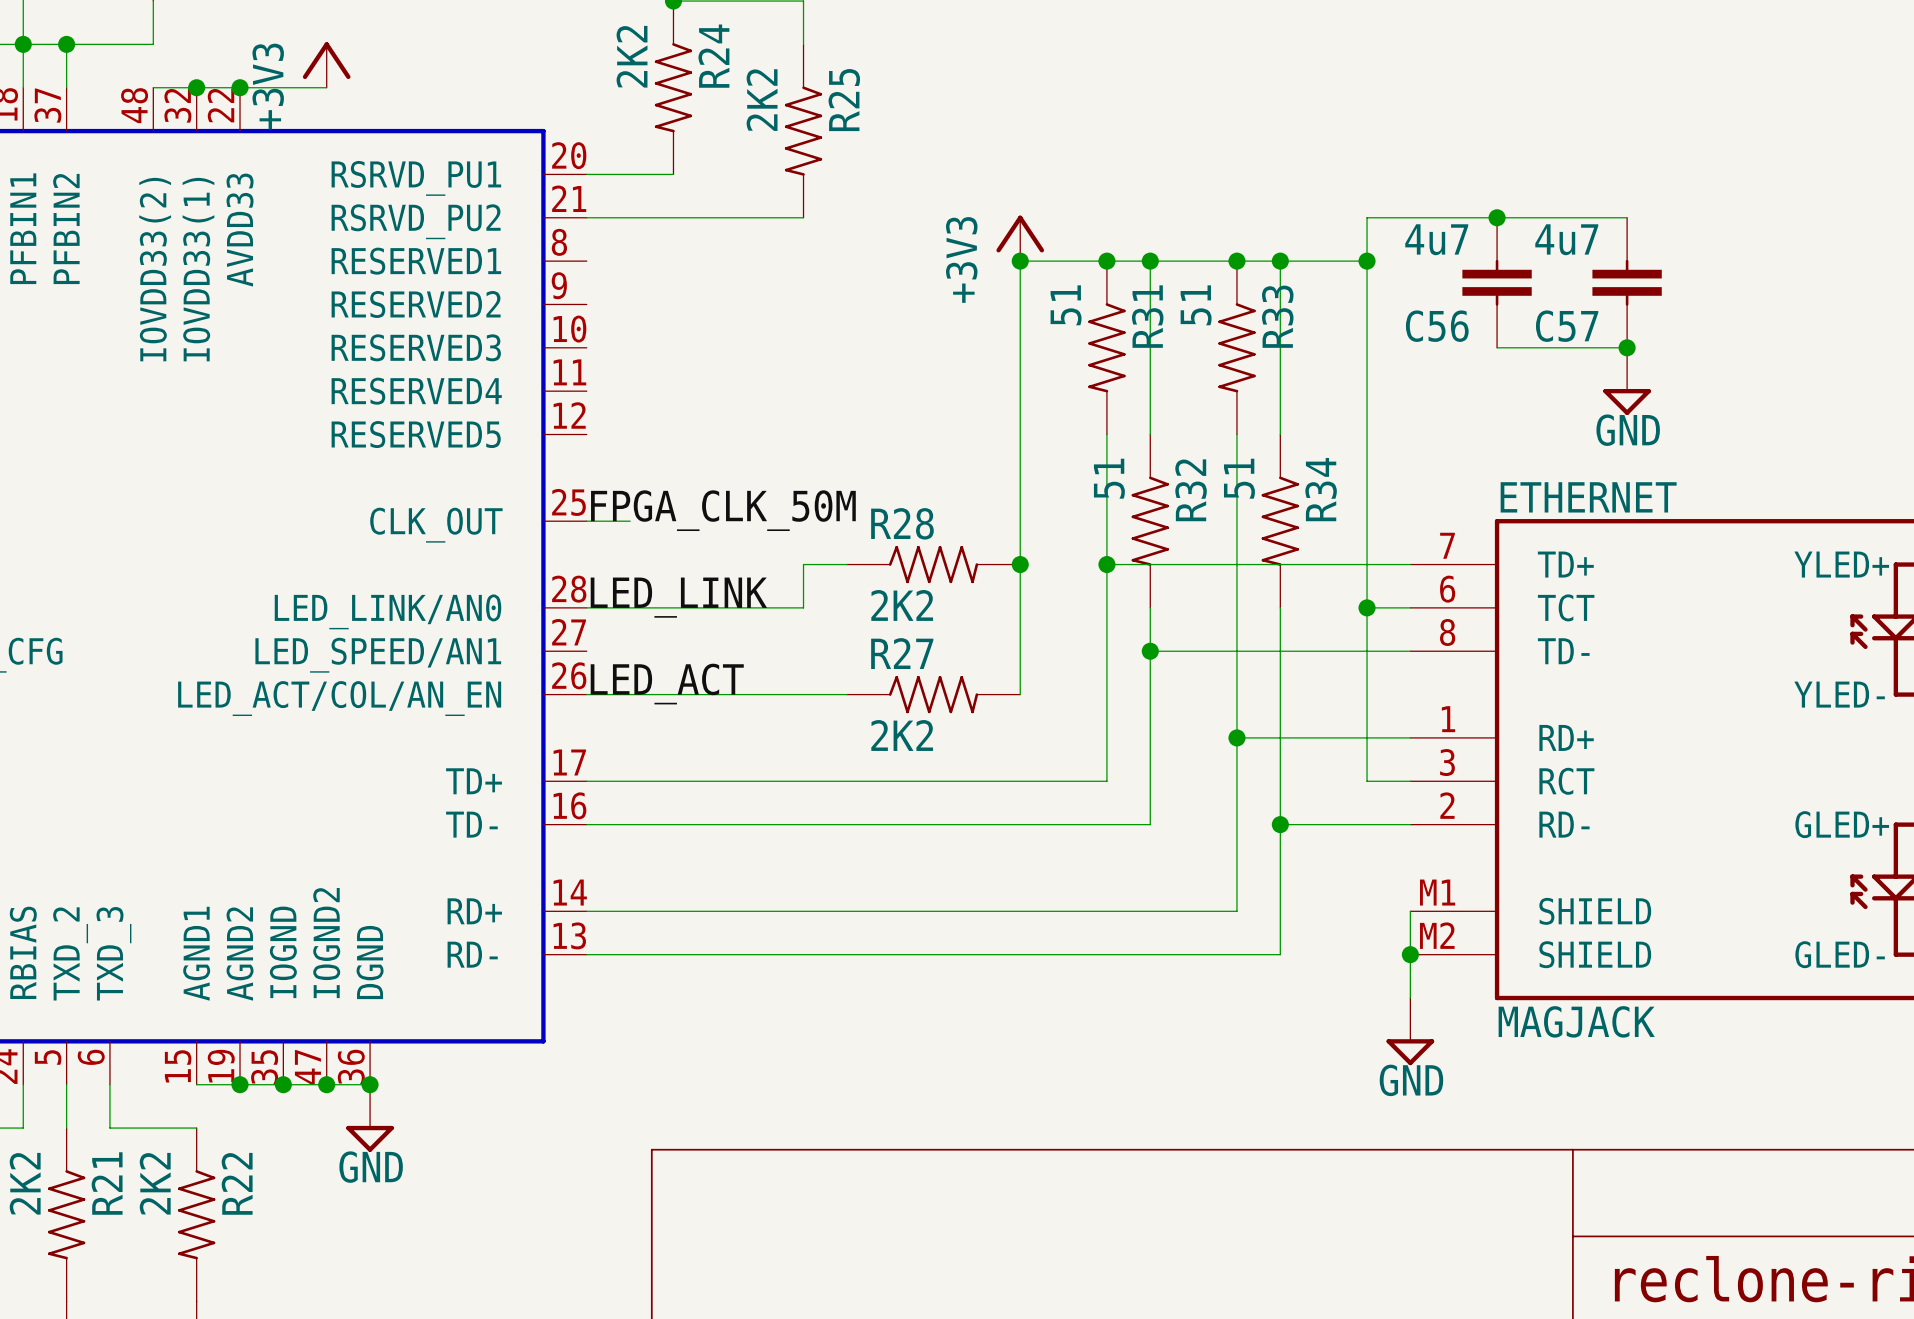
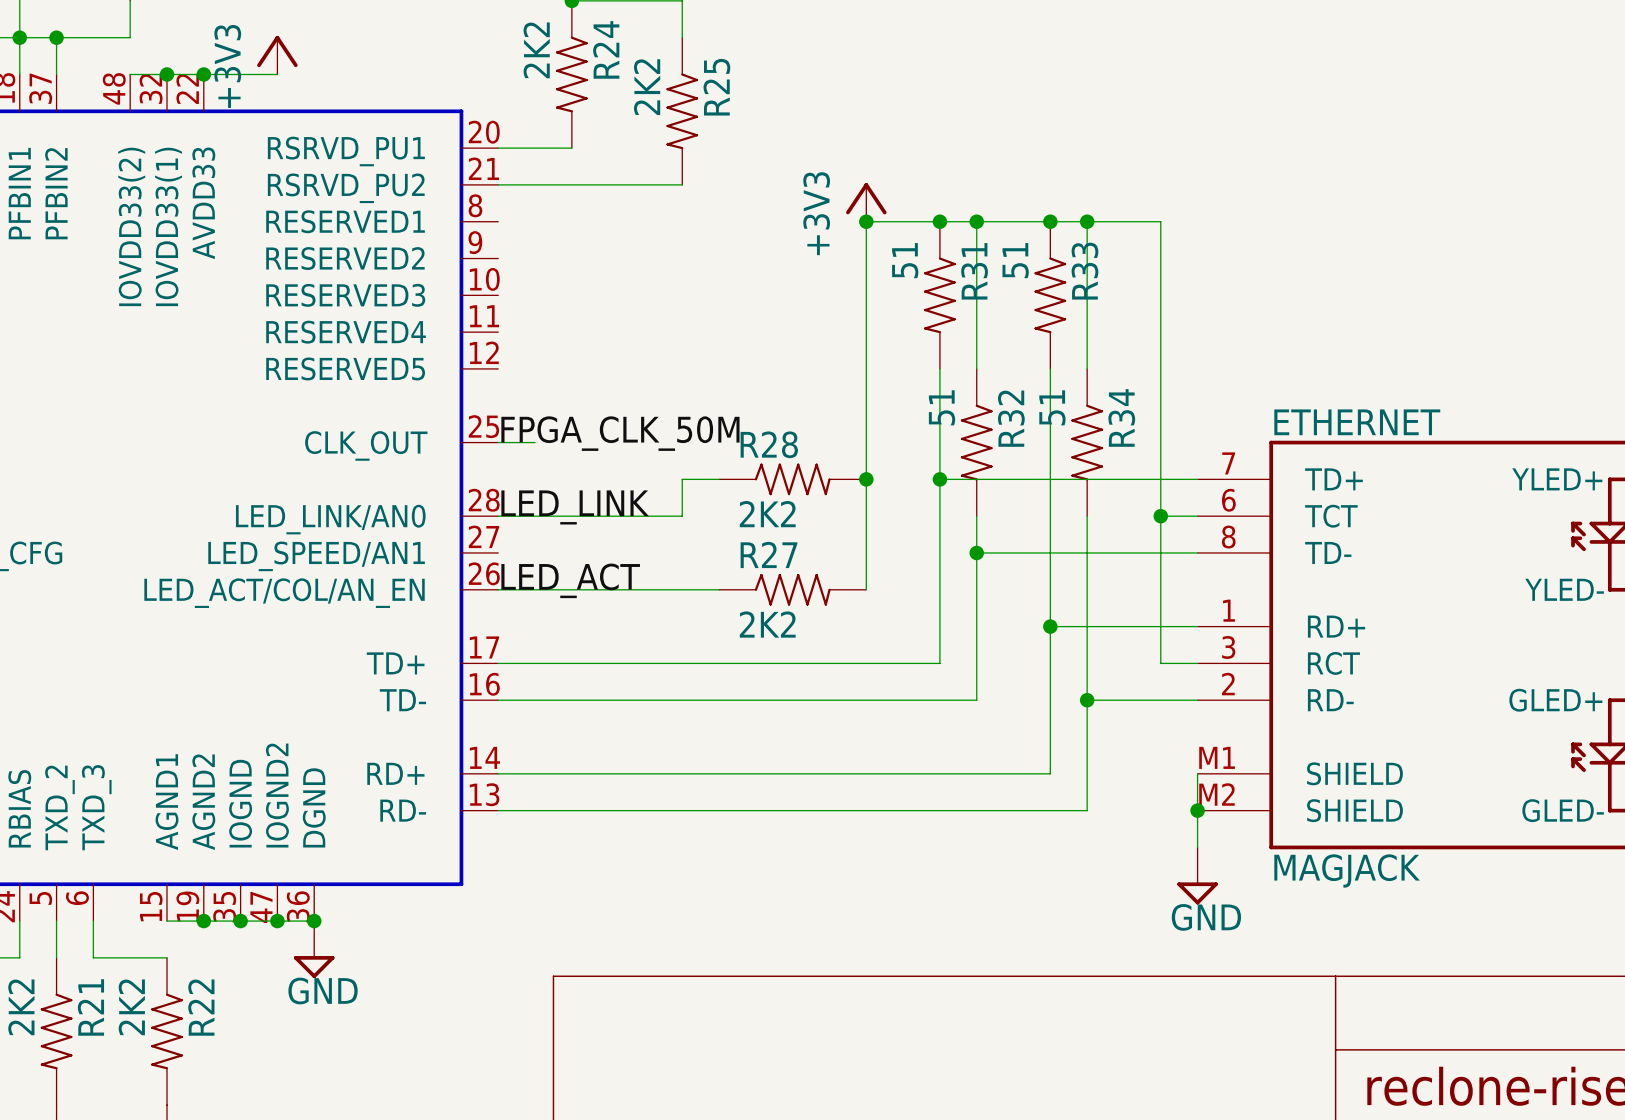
junction: (1497, 217) -> none
wire: (1627, 217) (1367, 217) (1367, 261) -> none
junction: (1367, 261) -> none
C56: 4u7 (1497, 282) -> none
C57: 4u7 (1627, 282) -> none
wire: (1497, 347) (1627, 347) -> none
junction: (1627, 347) -> none
power symbol: GND (1627, 381) -> none

